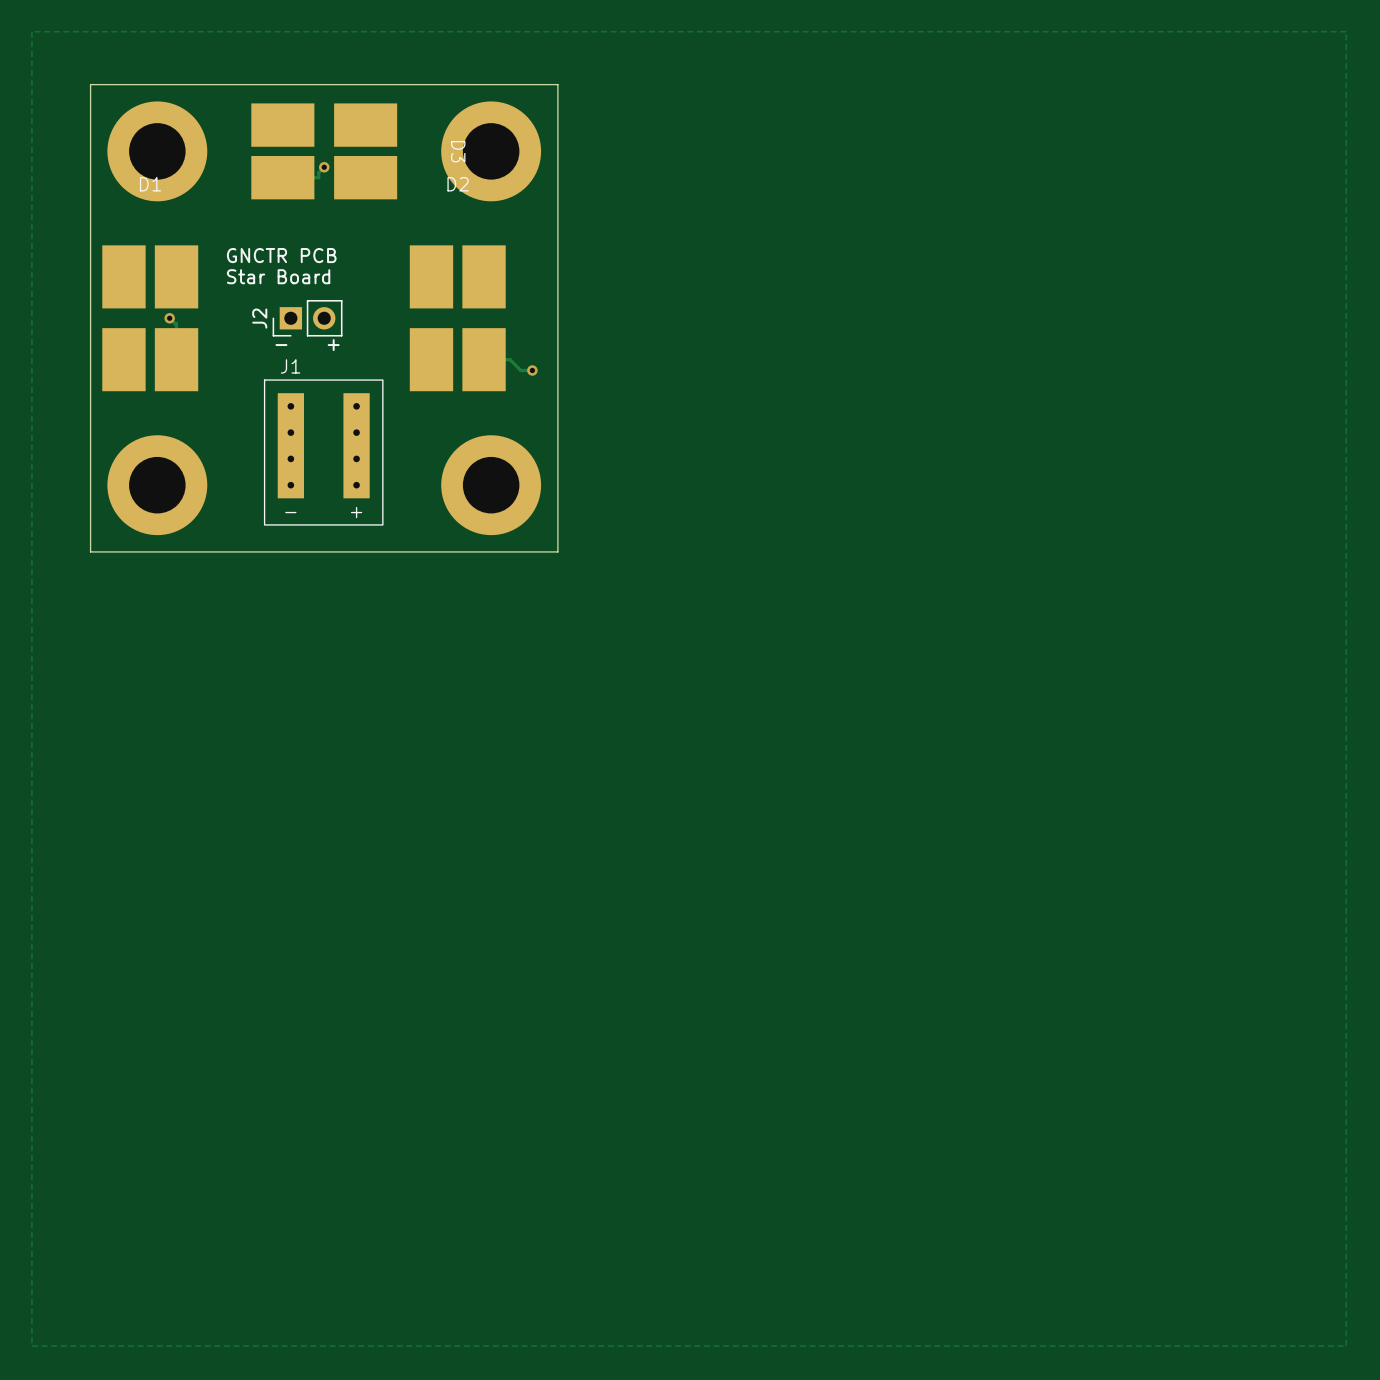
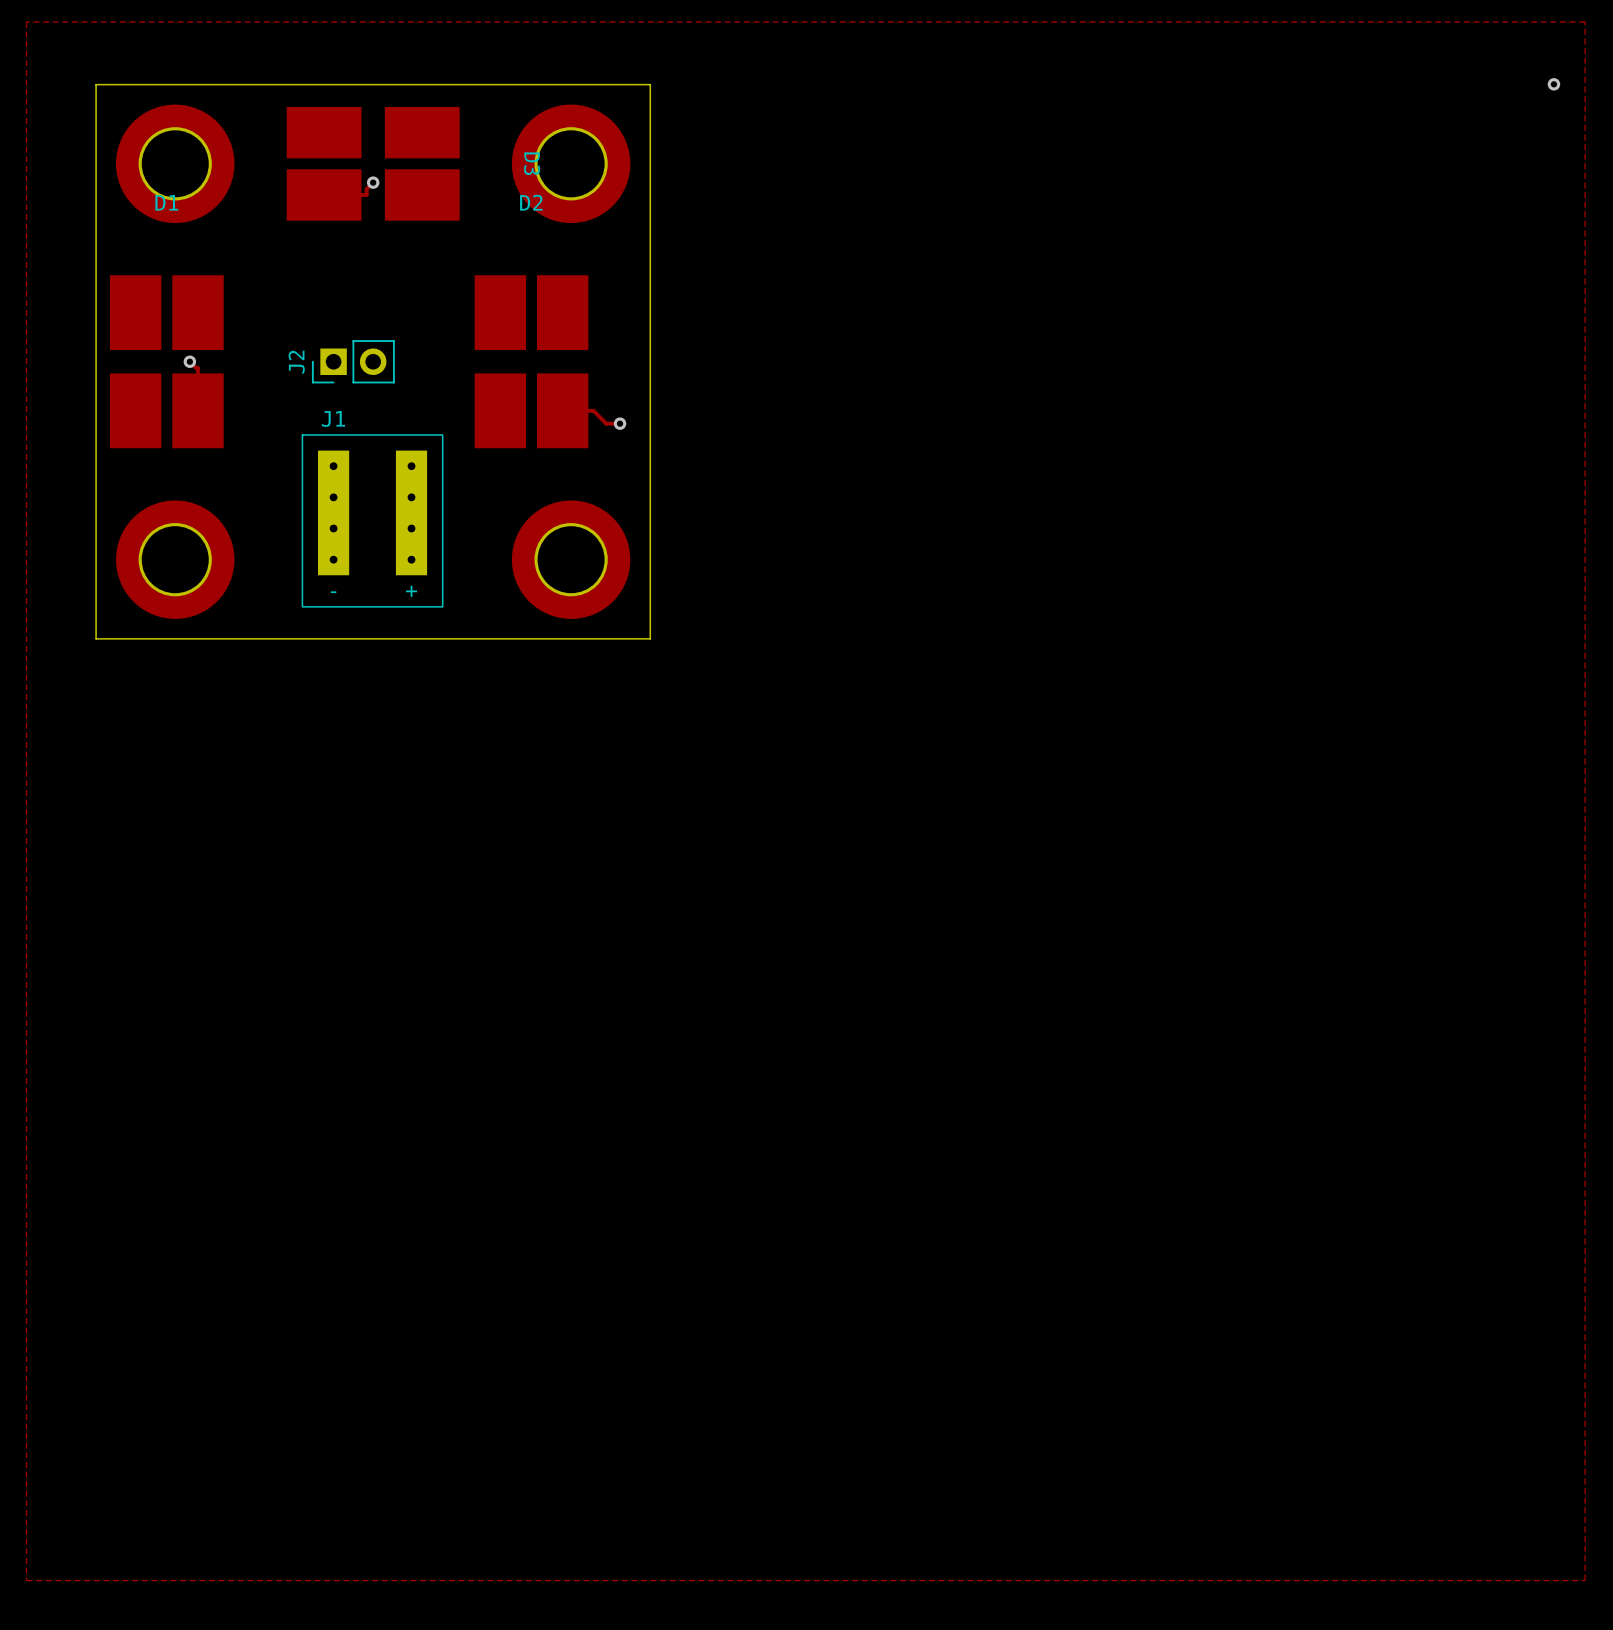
via: none -> (1553, 84)
text: GNCTR PCB (281, 255) -> none
text: Star Board (278, 276) -> none
text: - (281, 345) -> none
text: + (333, 345) -> none

